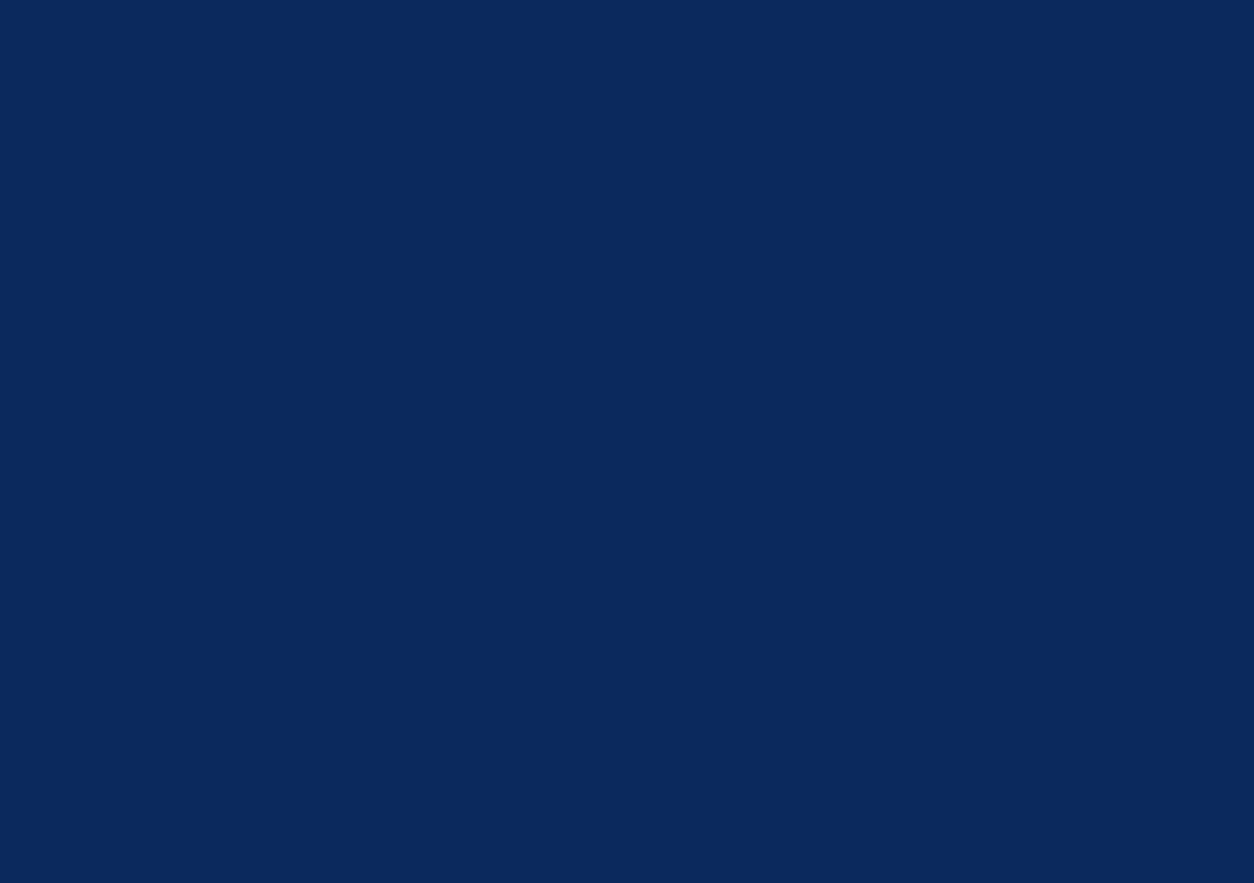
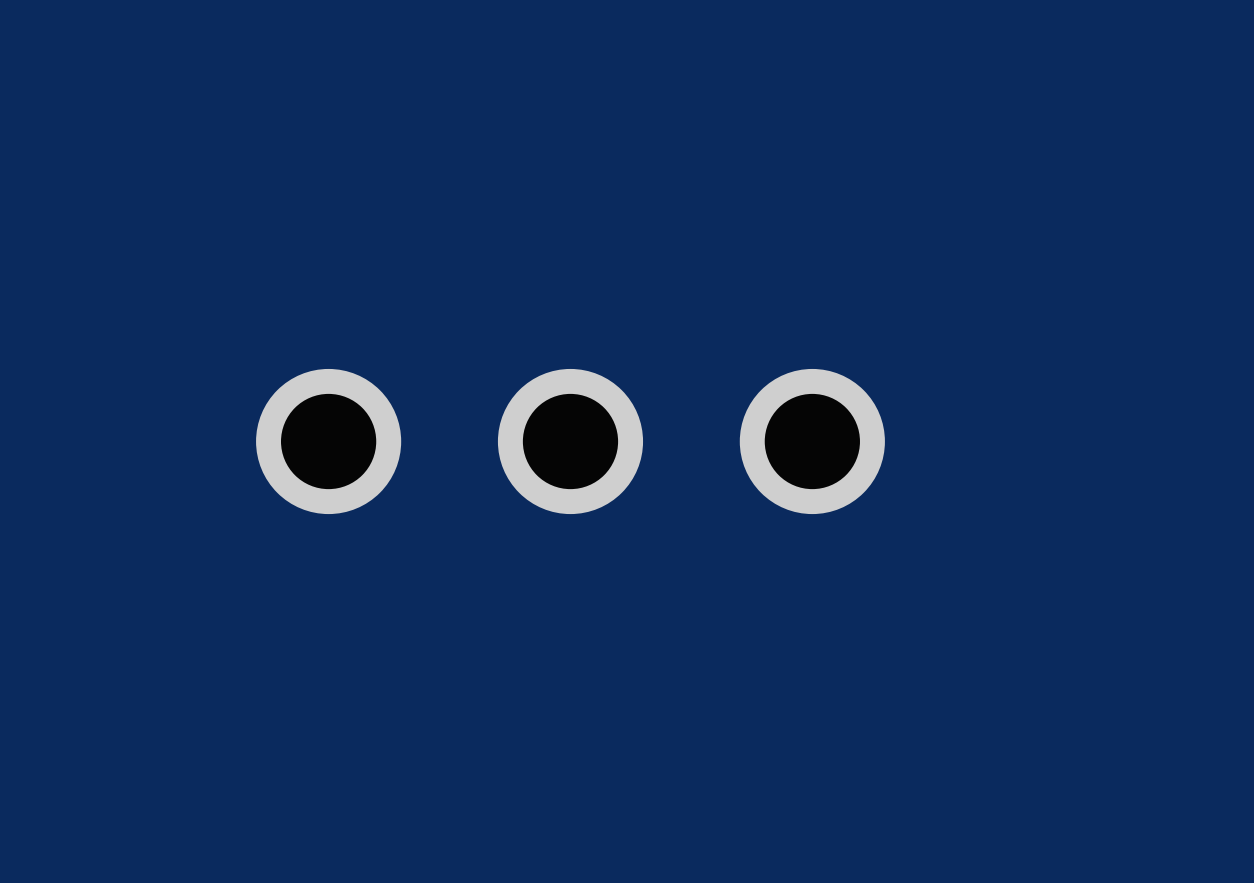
part: none -> (570, 441)

